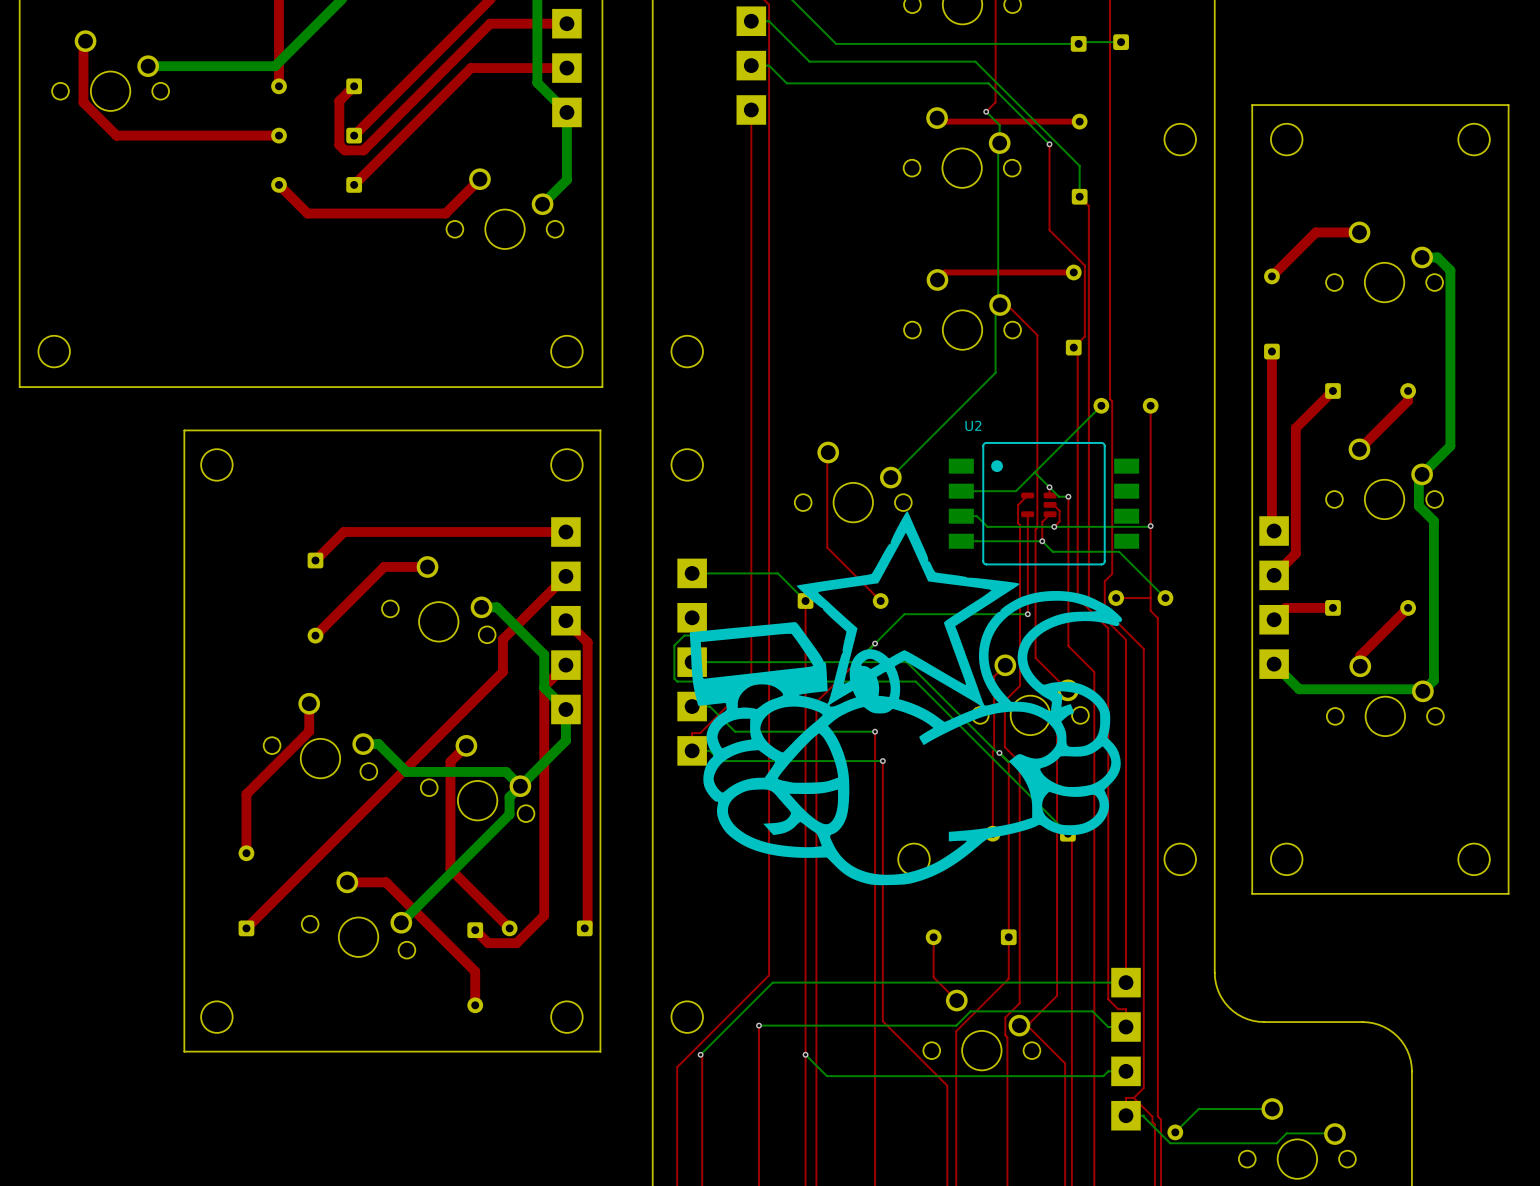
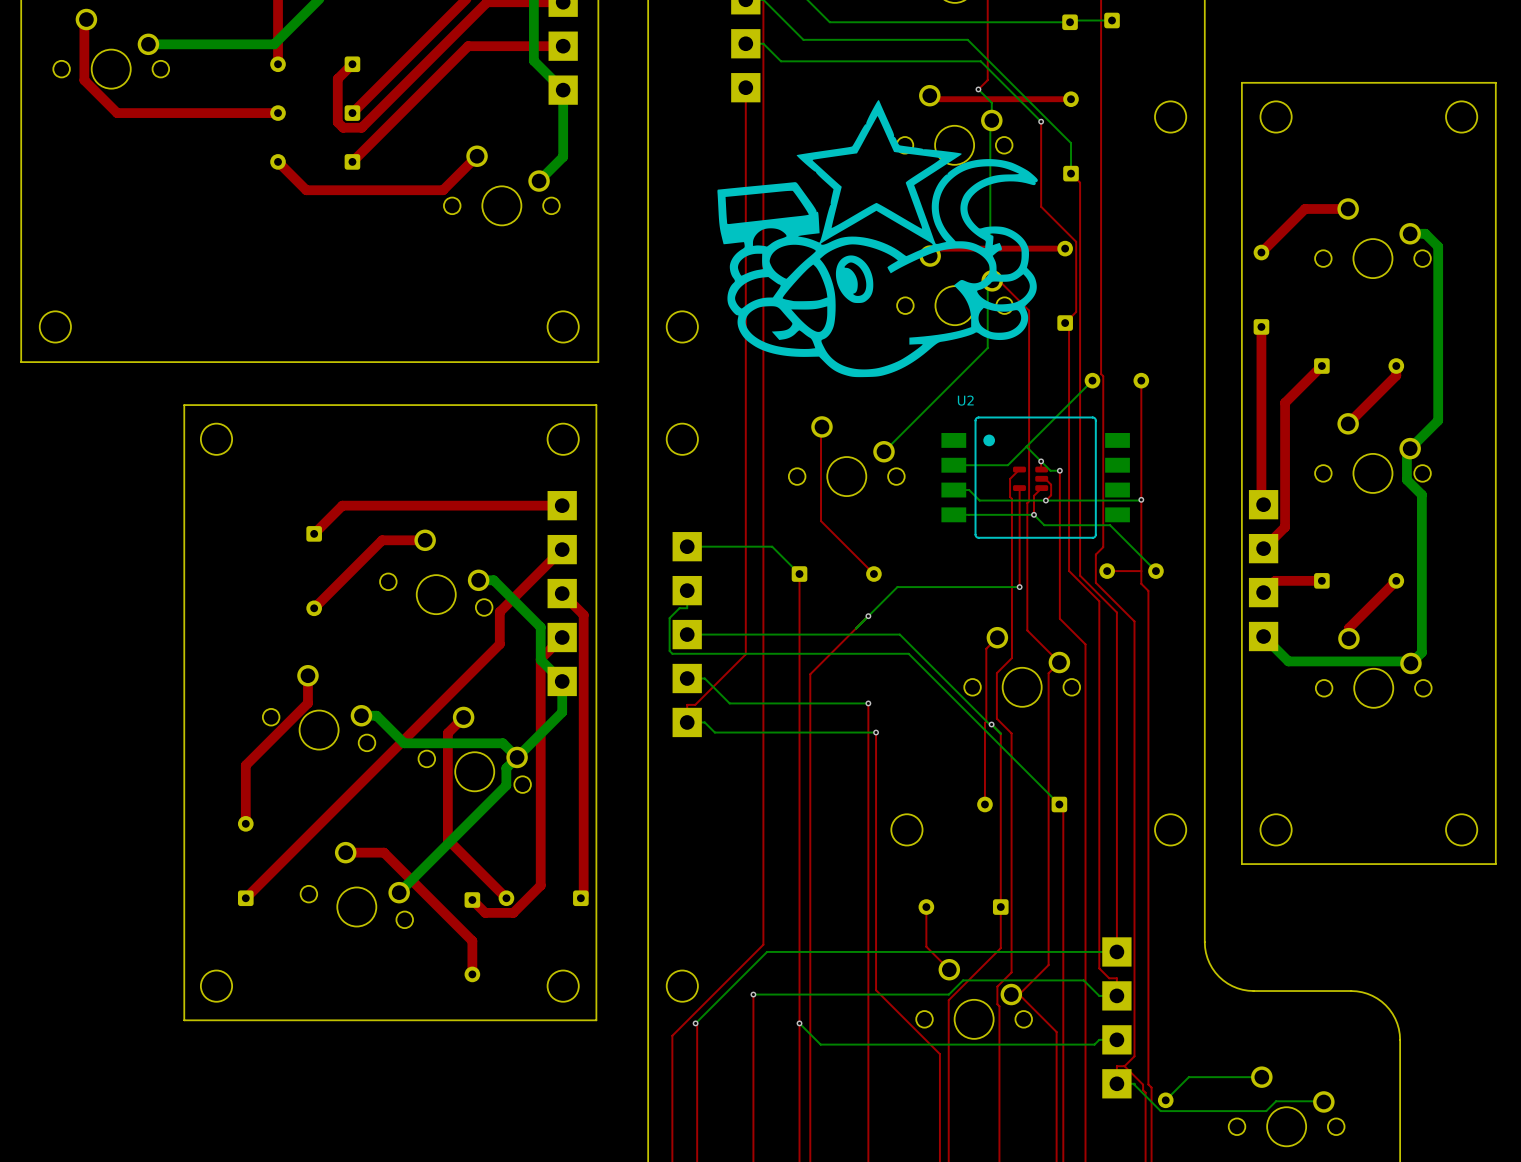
drawing: none -> [717, 100, 1038, 378]
drawing: [689, 511, 1123, 886] -> none

